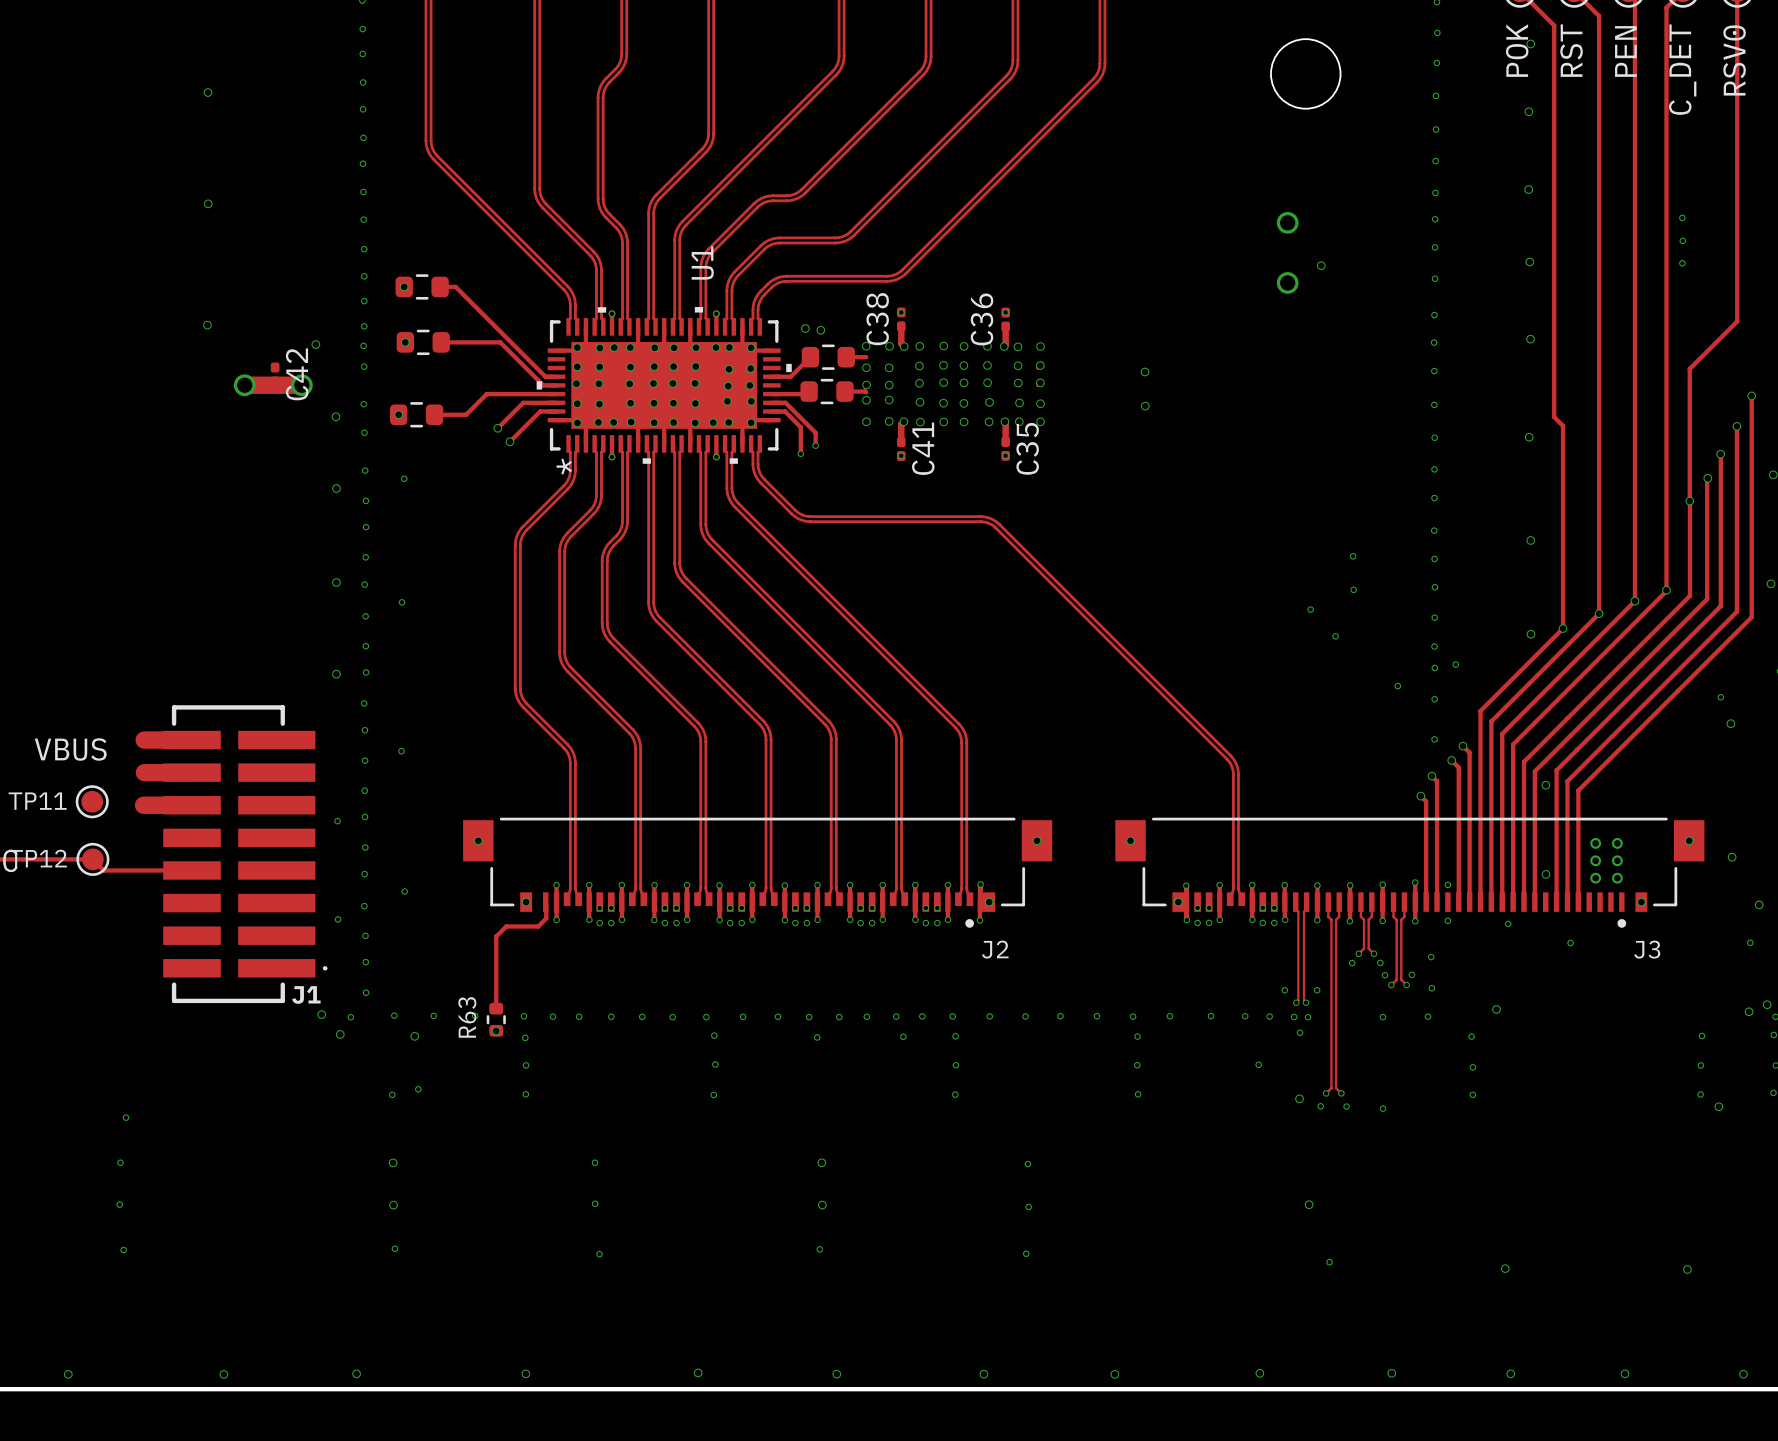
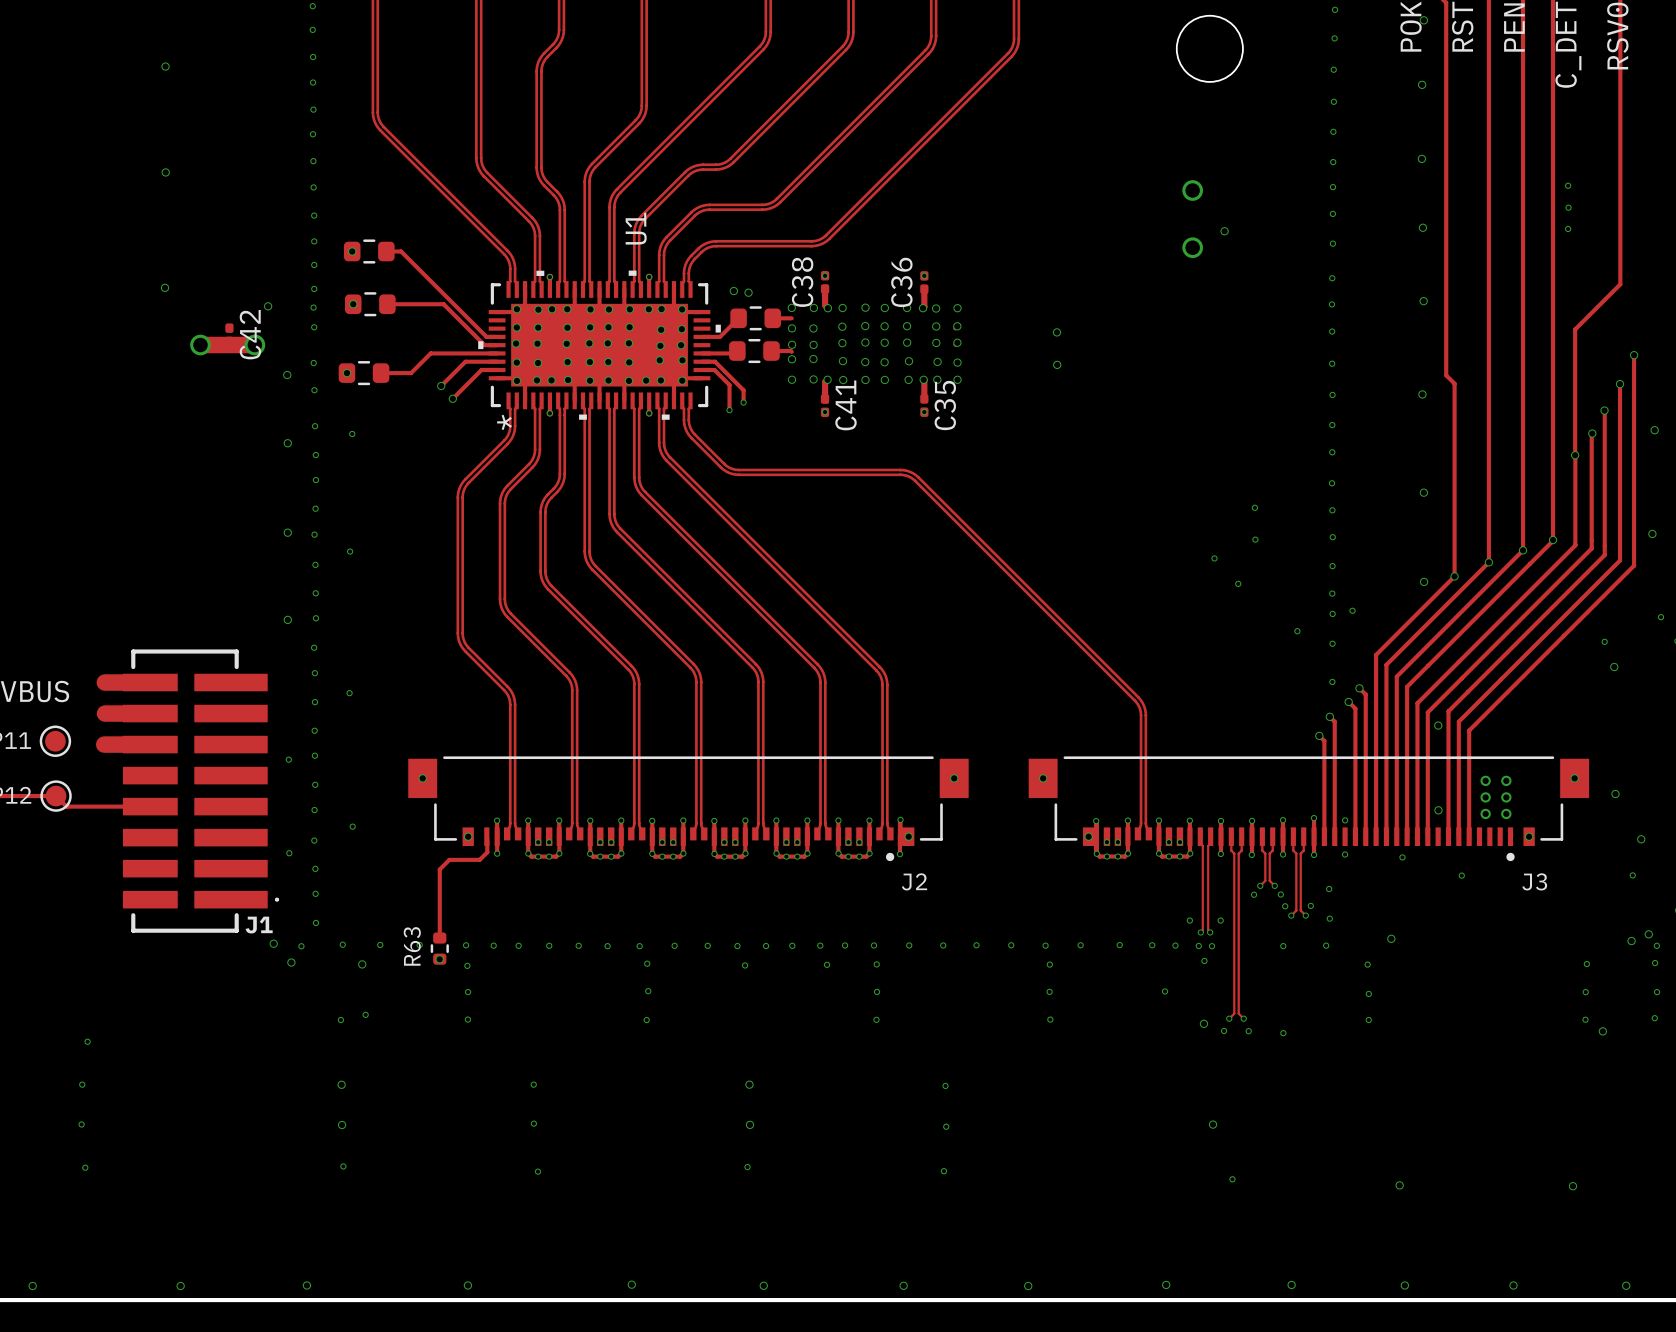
track: none -> (528, 853) (531, 856) (556, 856) (559, 853)
track: none -> (621, 853) (618, 856) (593, 856) (590, 853)
track: none -> (683, 853) (680, 856) (655, 856) (652, 853)
track: none -> (745, 853) (742, 856) (717, 856) (714, 853)
track: none -> (776, 853) (779, 856) (804, 856) (807, 853)
track: none -> (838, 853) (841, 856) (866, 856) (869, 853)
track: none -> (1128, 853) (1125, 856) (1099, 856) (1096, 853)
track: none -> (1159, 853) (1162, 856) (1187, 856) (1190, 853)

